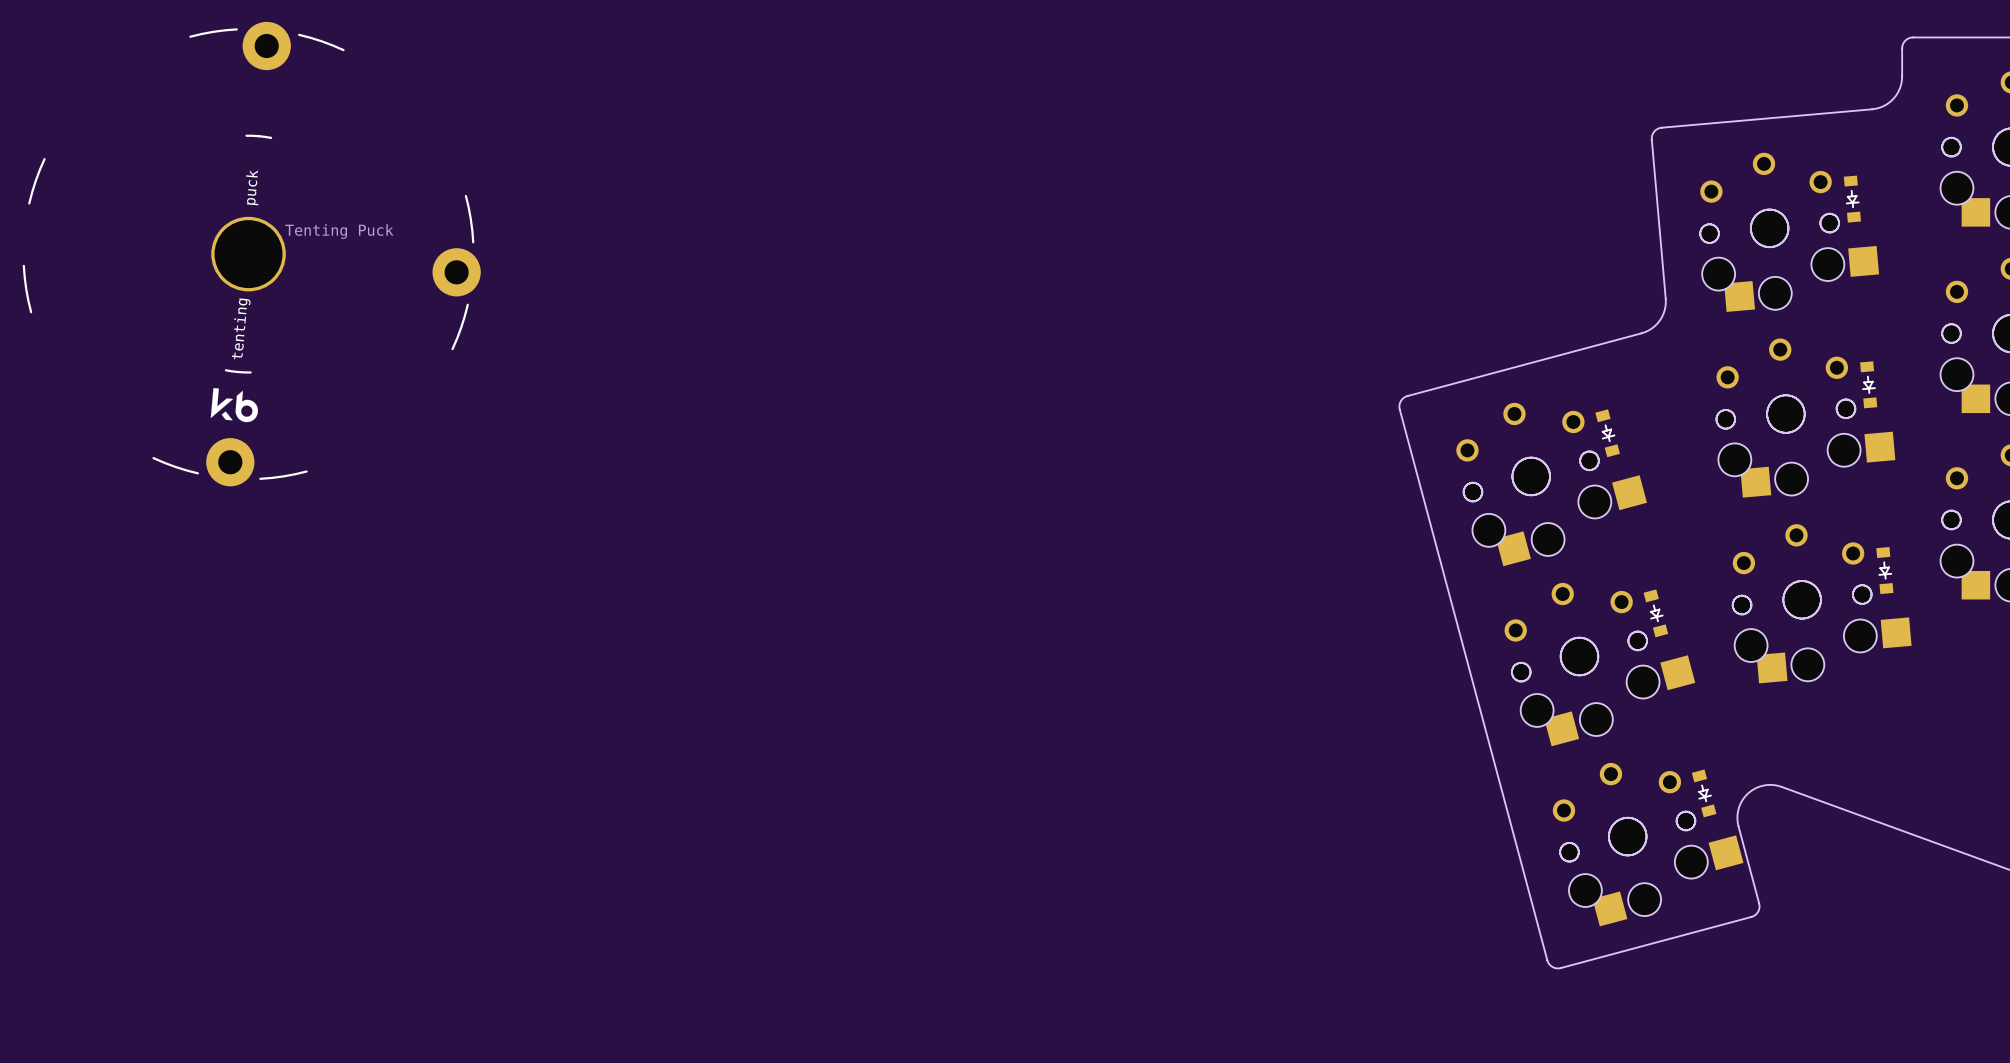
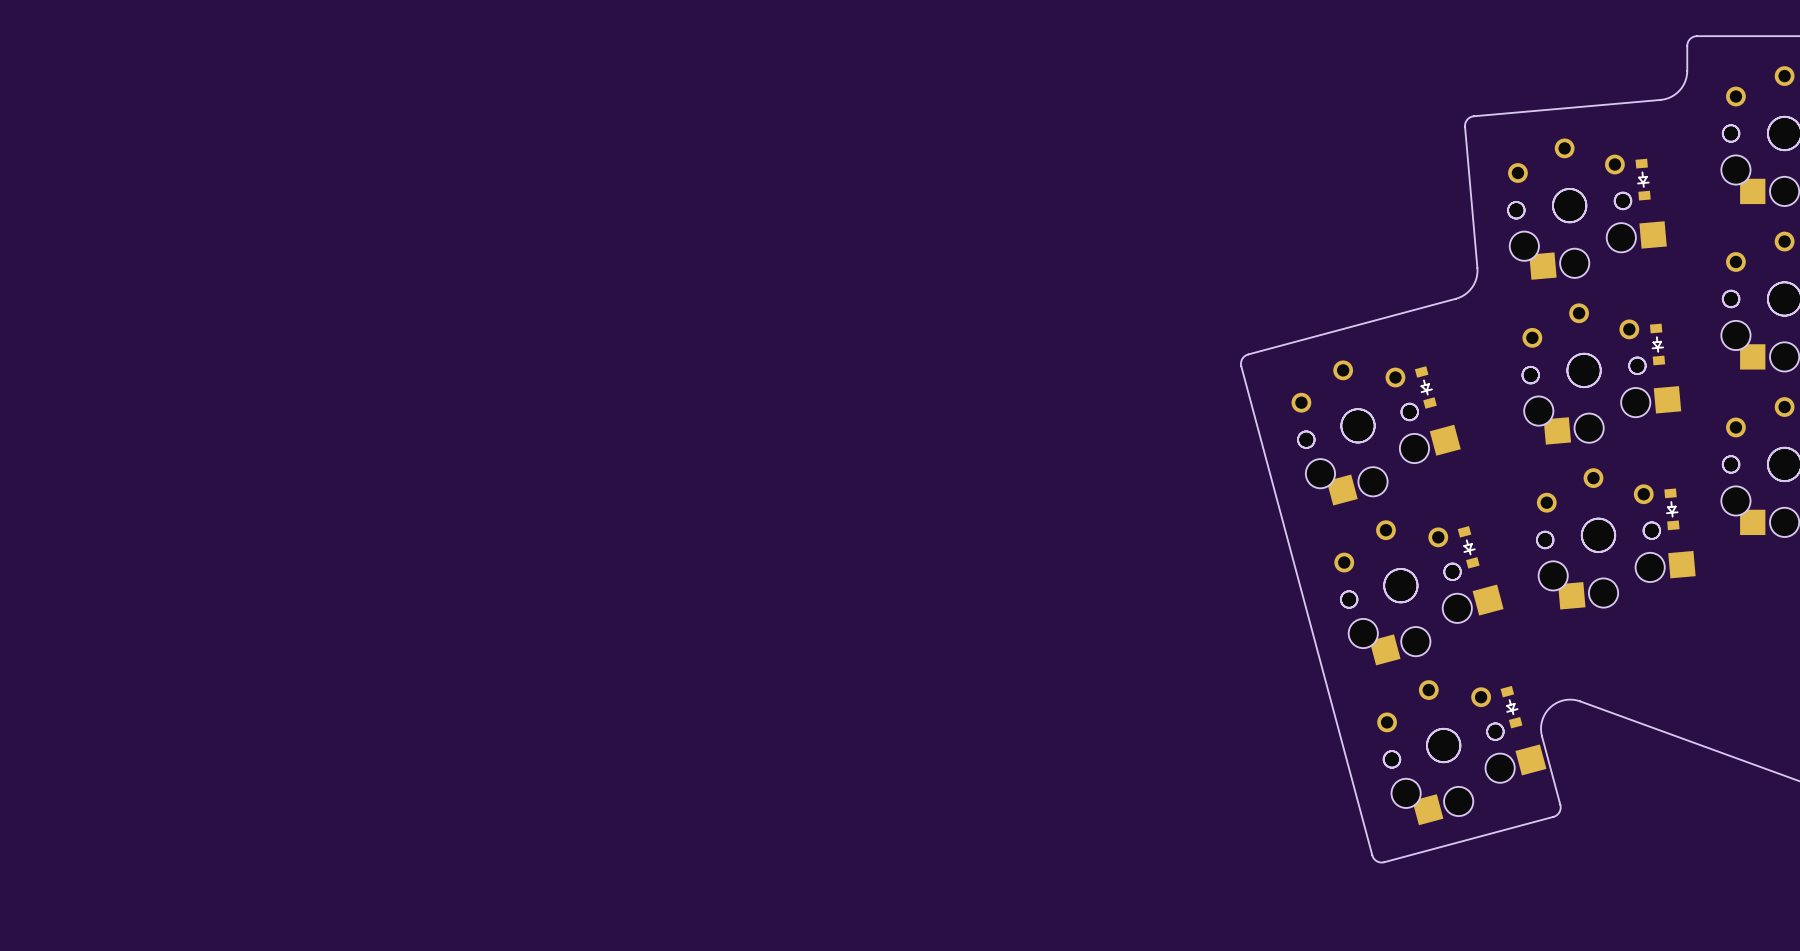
part: Tenting Puck (251, 254) -> none

